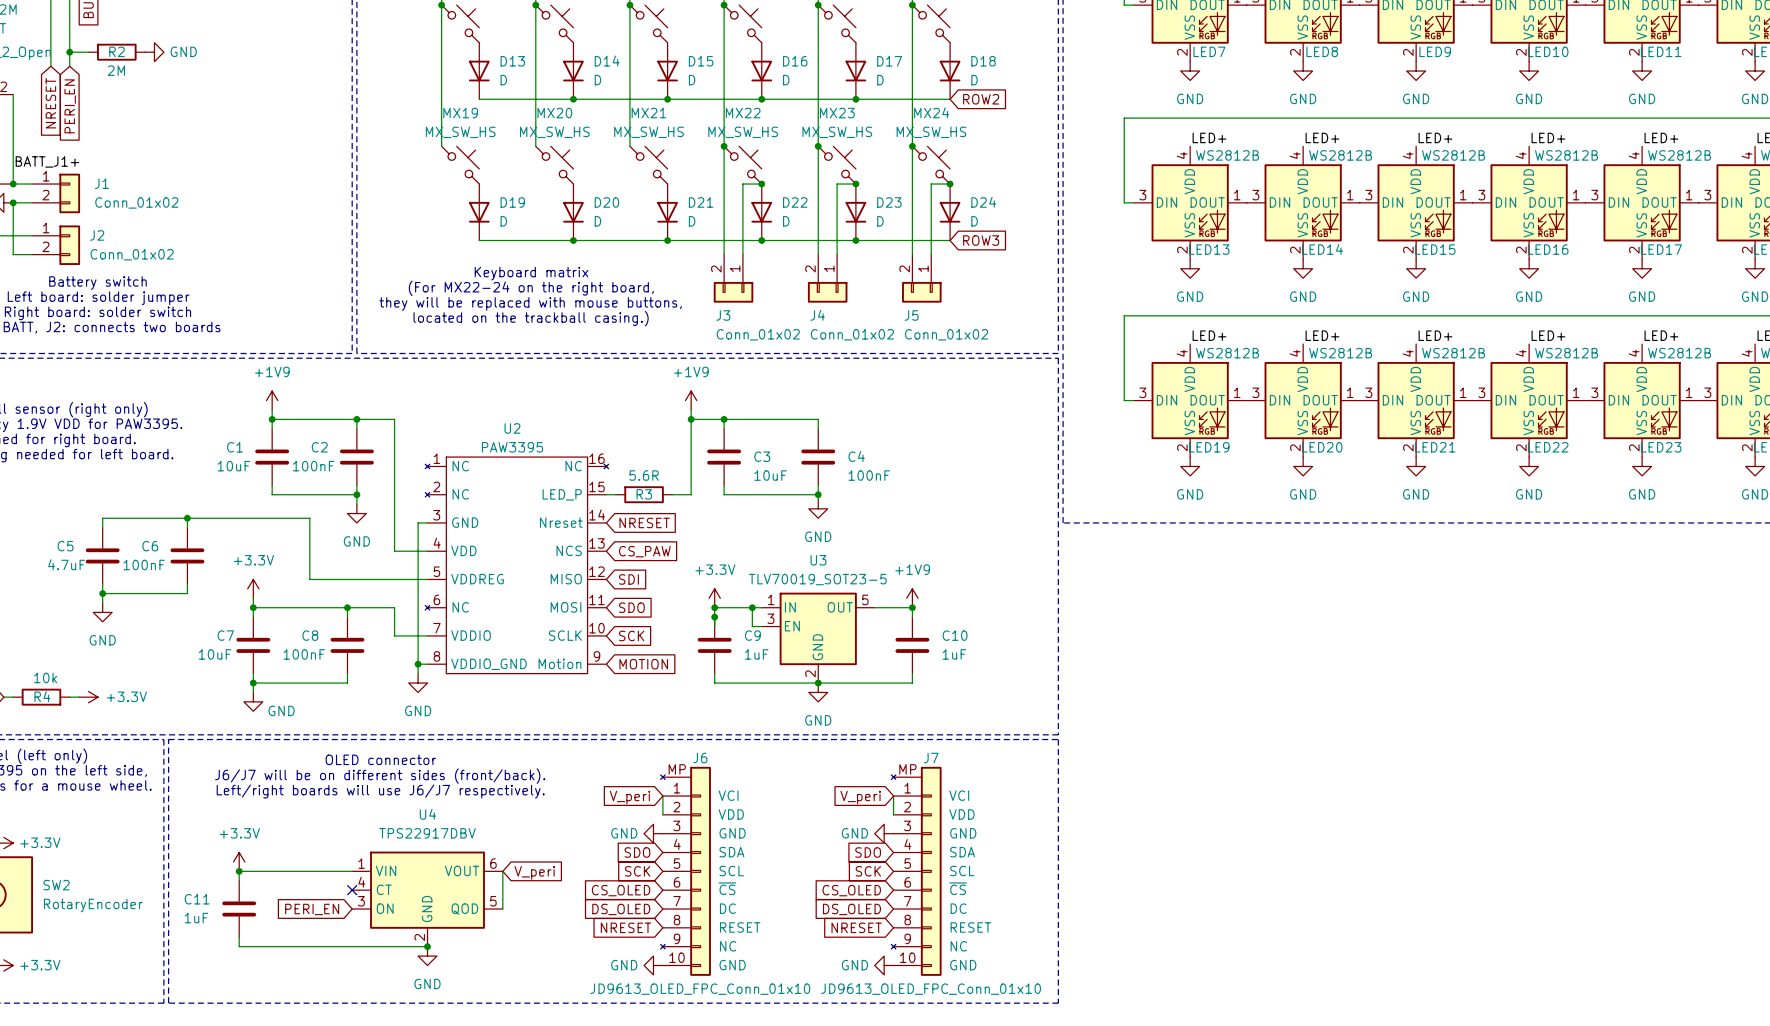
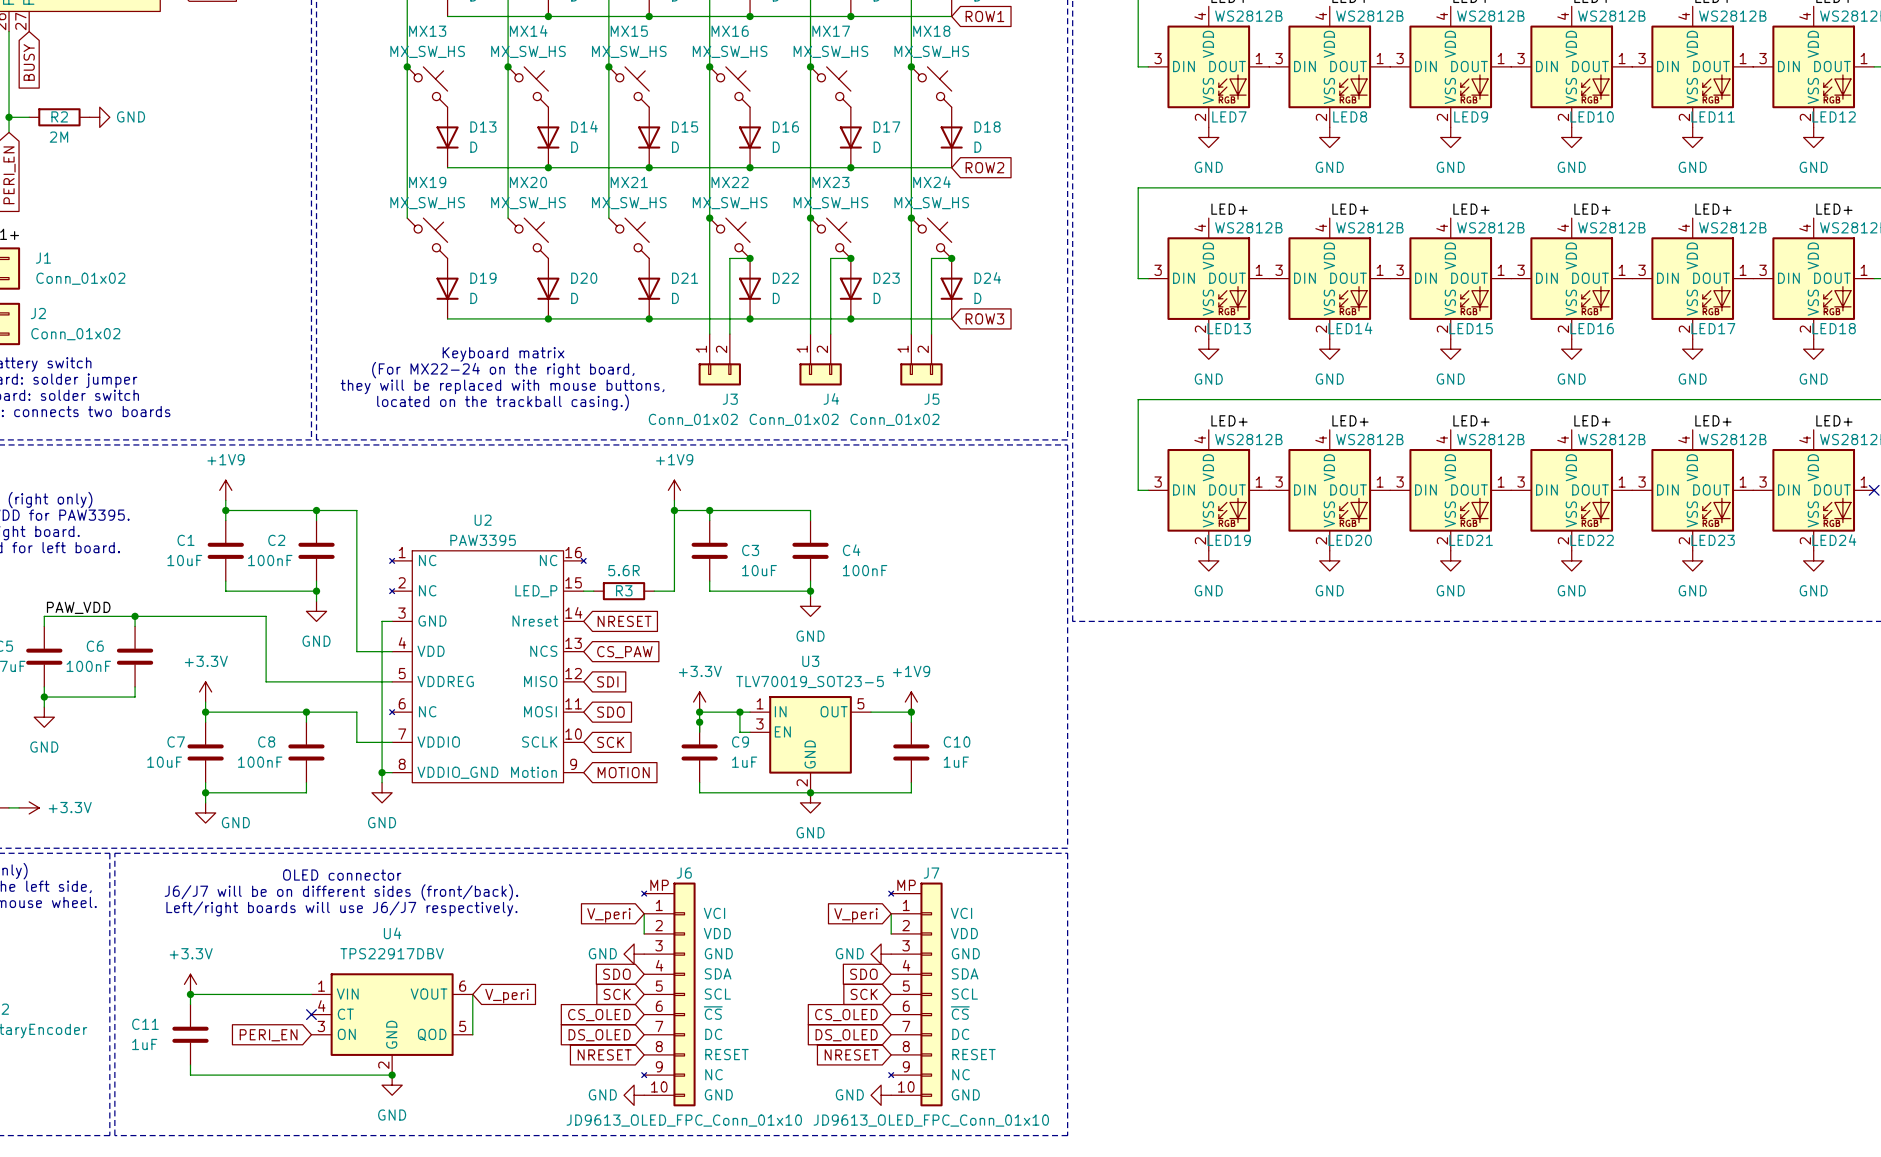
J3 flip: as is (733, 292) -> left-right (719, 374)
J4 flip: as is (827, 292) -> left-right (820, 374)
J5 flip: as is (921, 292) -> left-right (921, 374)
label: none -> PAW_VDD (78, 607)

